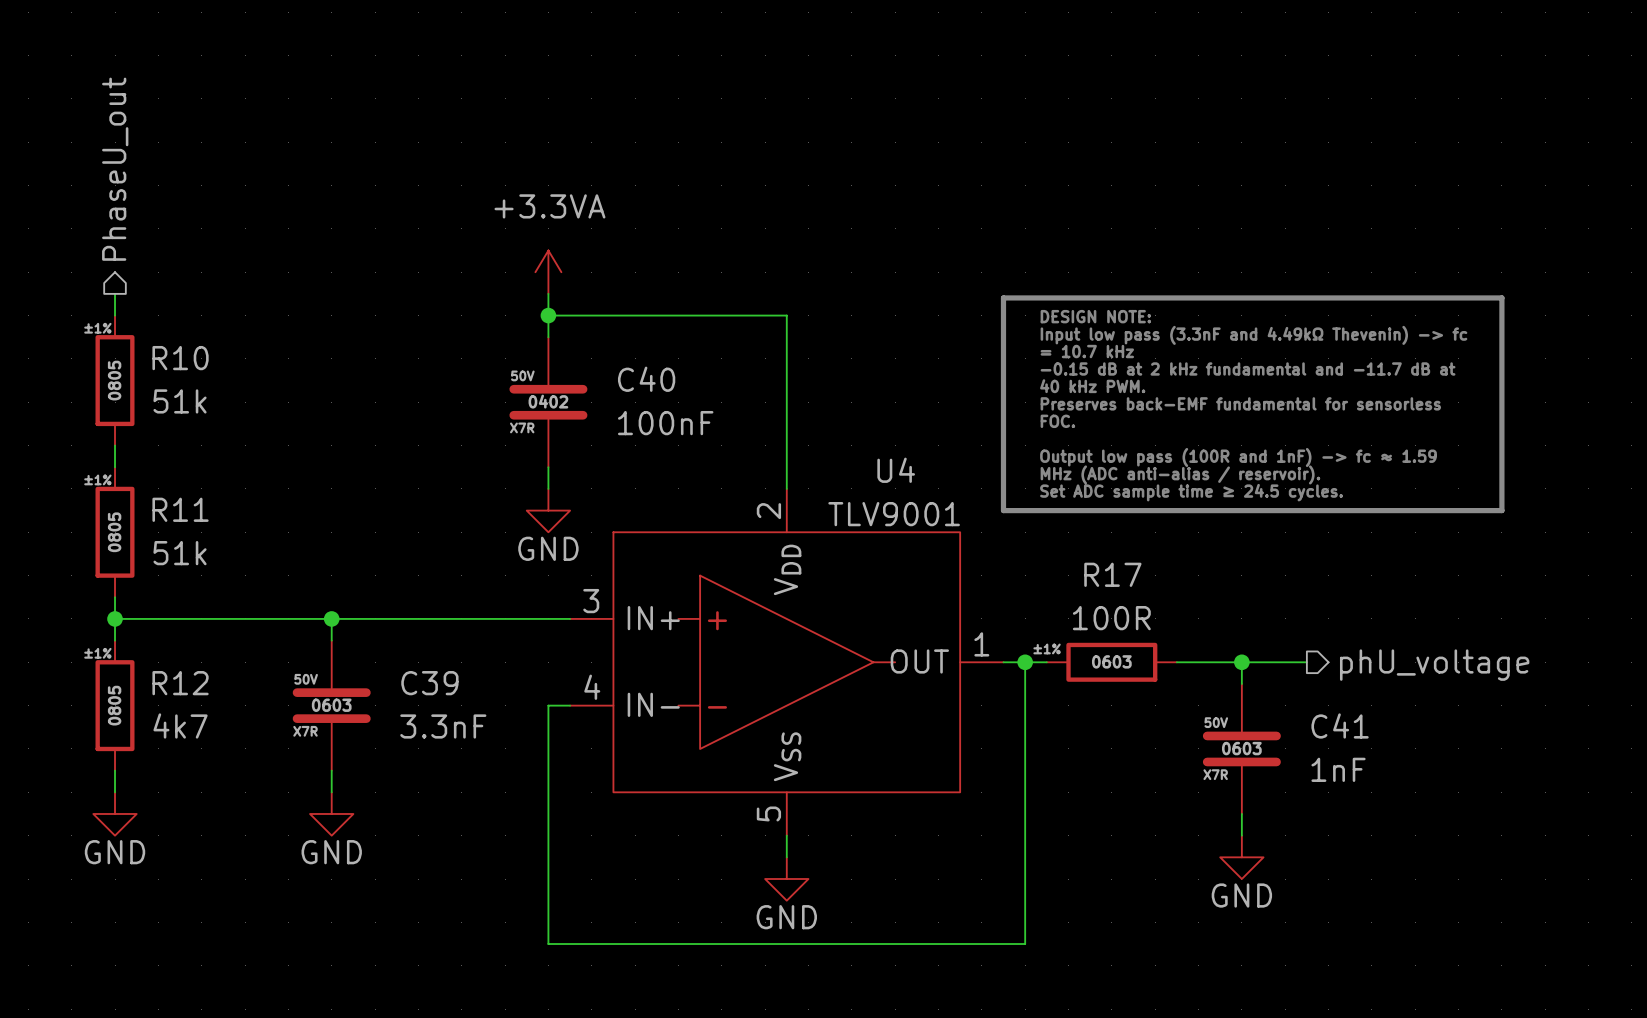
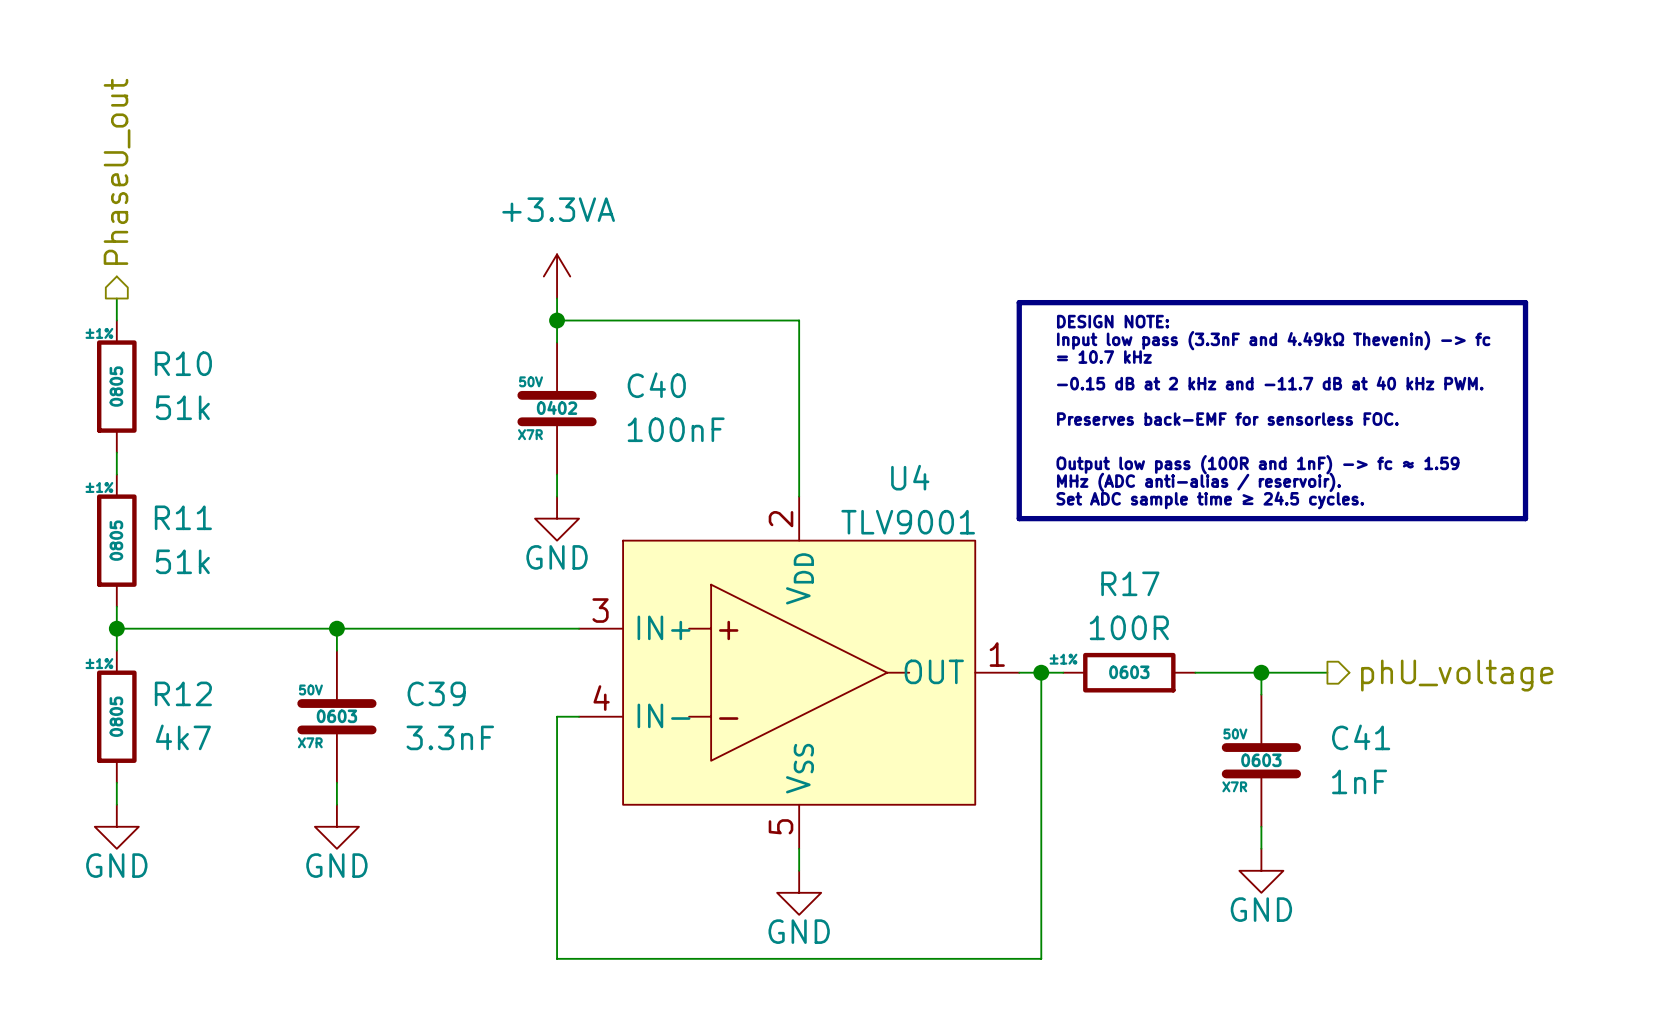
text: −0.15 dB at 2 kHz fundamental and −11.7 dB at (1248, 368) -> −0.15 dB at 2 kHz and −11.7 dB at 40 kHz PWM. (1270, 383)
text: 40 kHz PWM. (1092, 386) -> none
text: Preserves back-EMF fundamental for sensorless (1240, 403) -> Preserves back-EMF for sensorless FOC. (1227, 419)
text: FOC. (1057, 421) -> none

